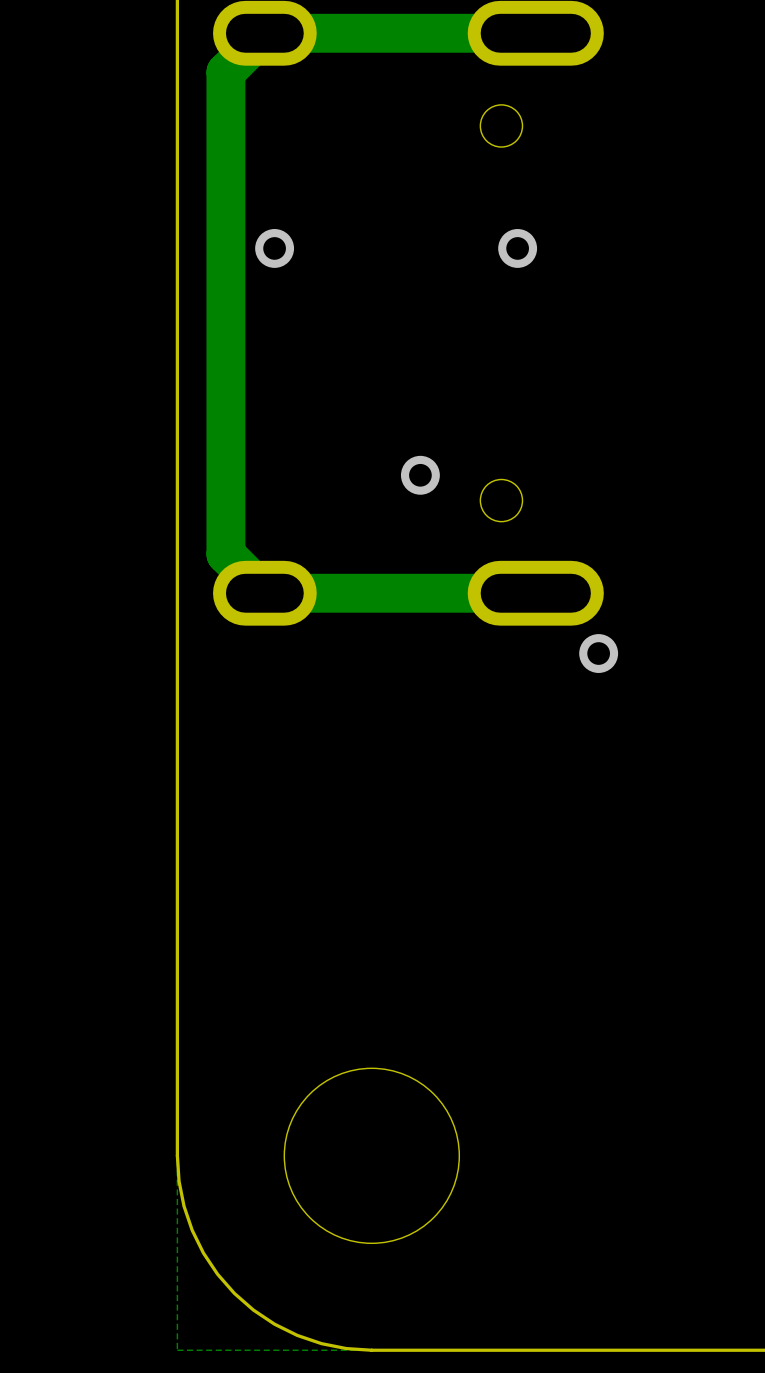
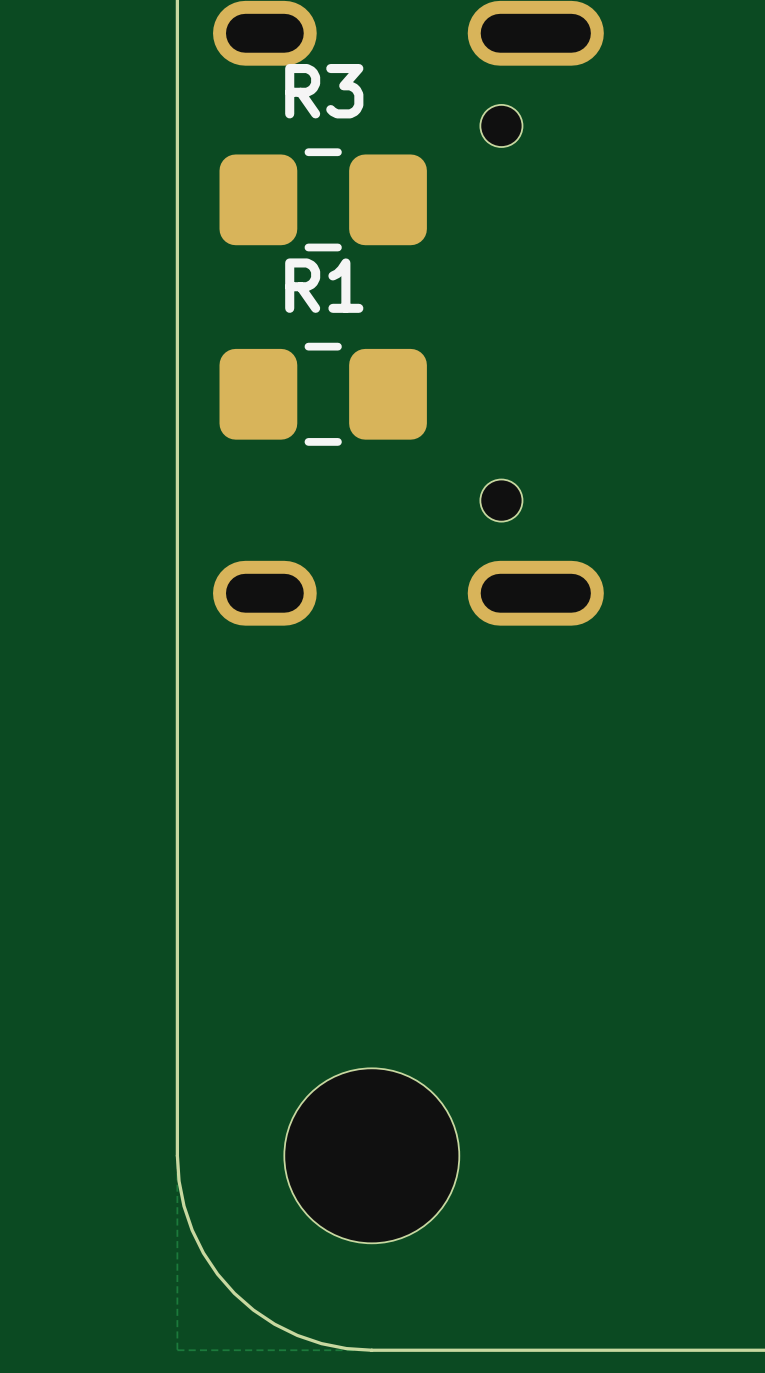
track: (535, 33) (264, 33) (225, 72) (225, 554) (264, 593) (535, 593) -> none
R3: none -> (323, 199)
via: (274, 248) -> none
via: (517, 248) -> none
R1: none -> (323, 394)
via: (420, 475) -> none
via: (598, 653) -> none

